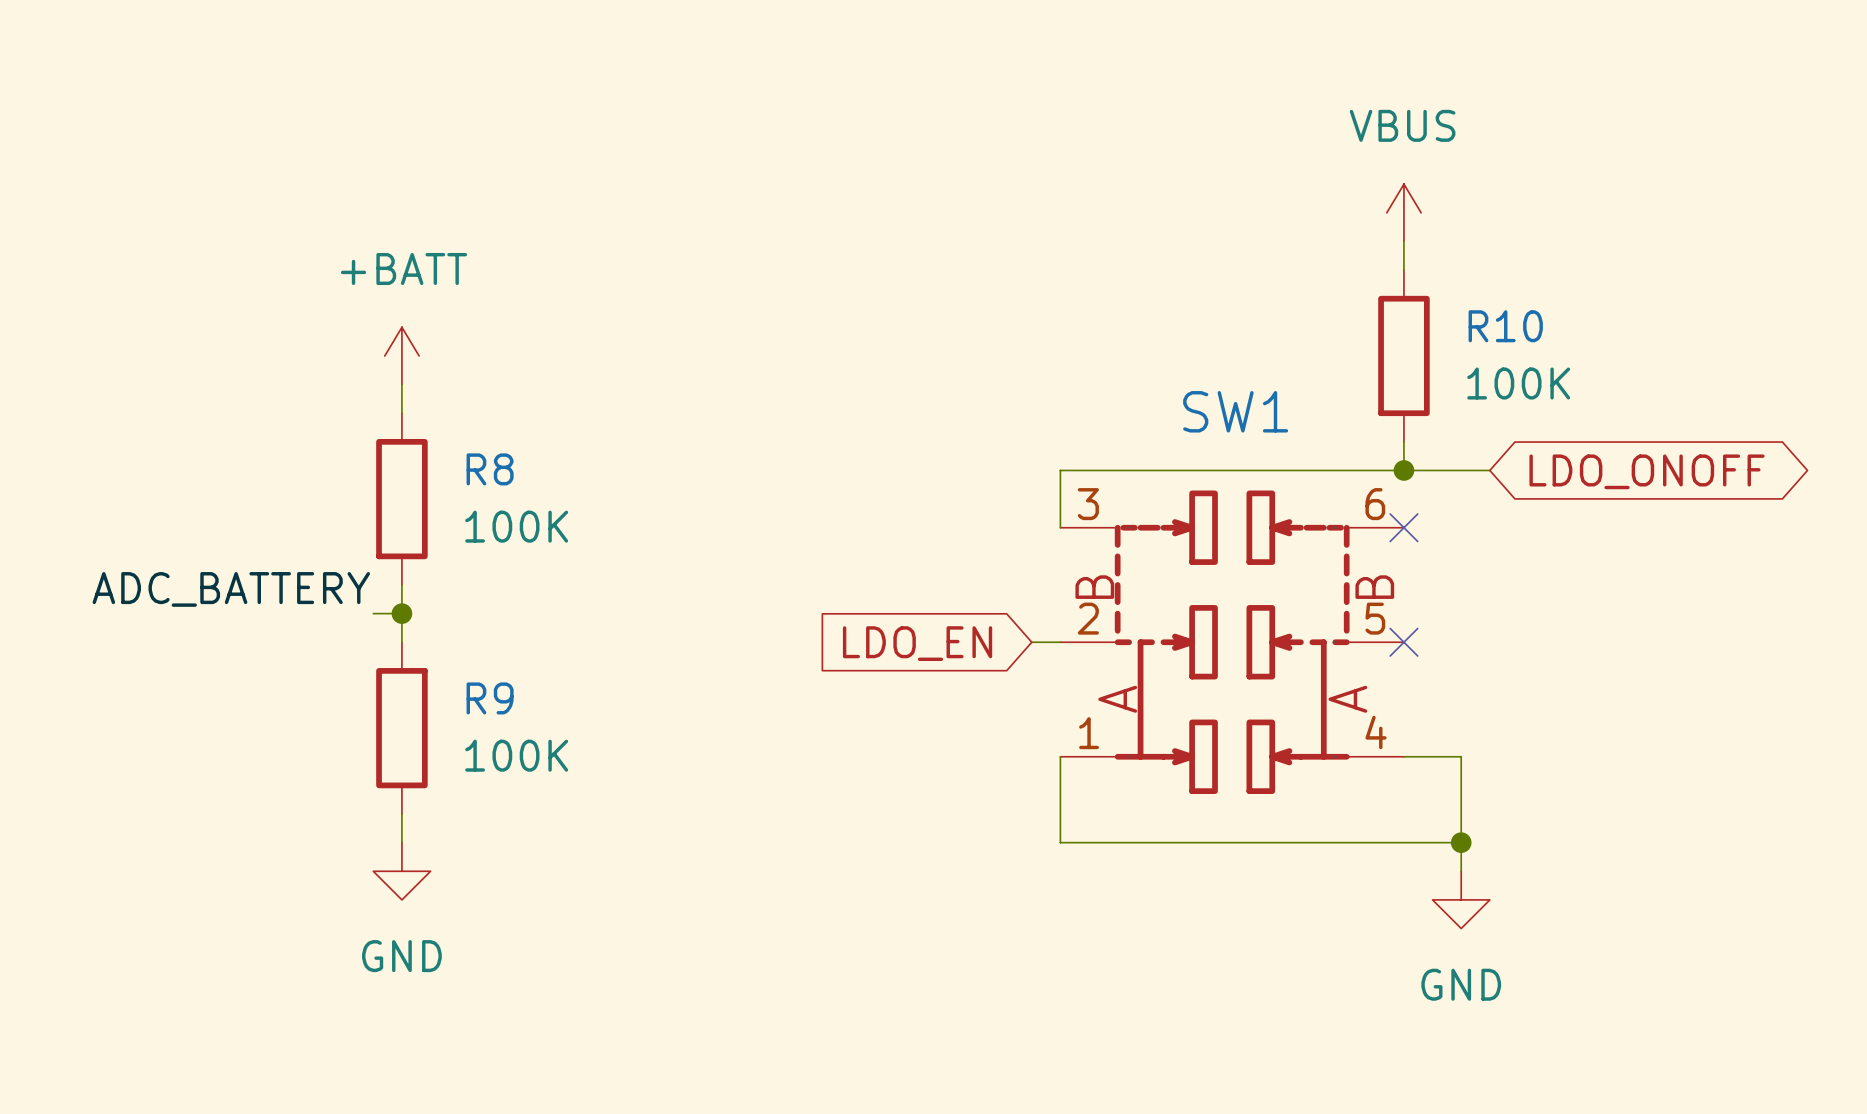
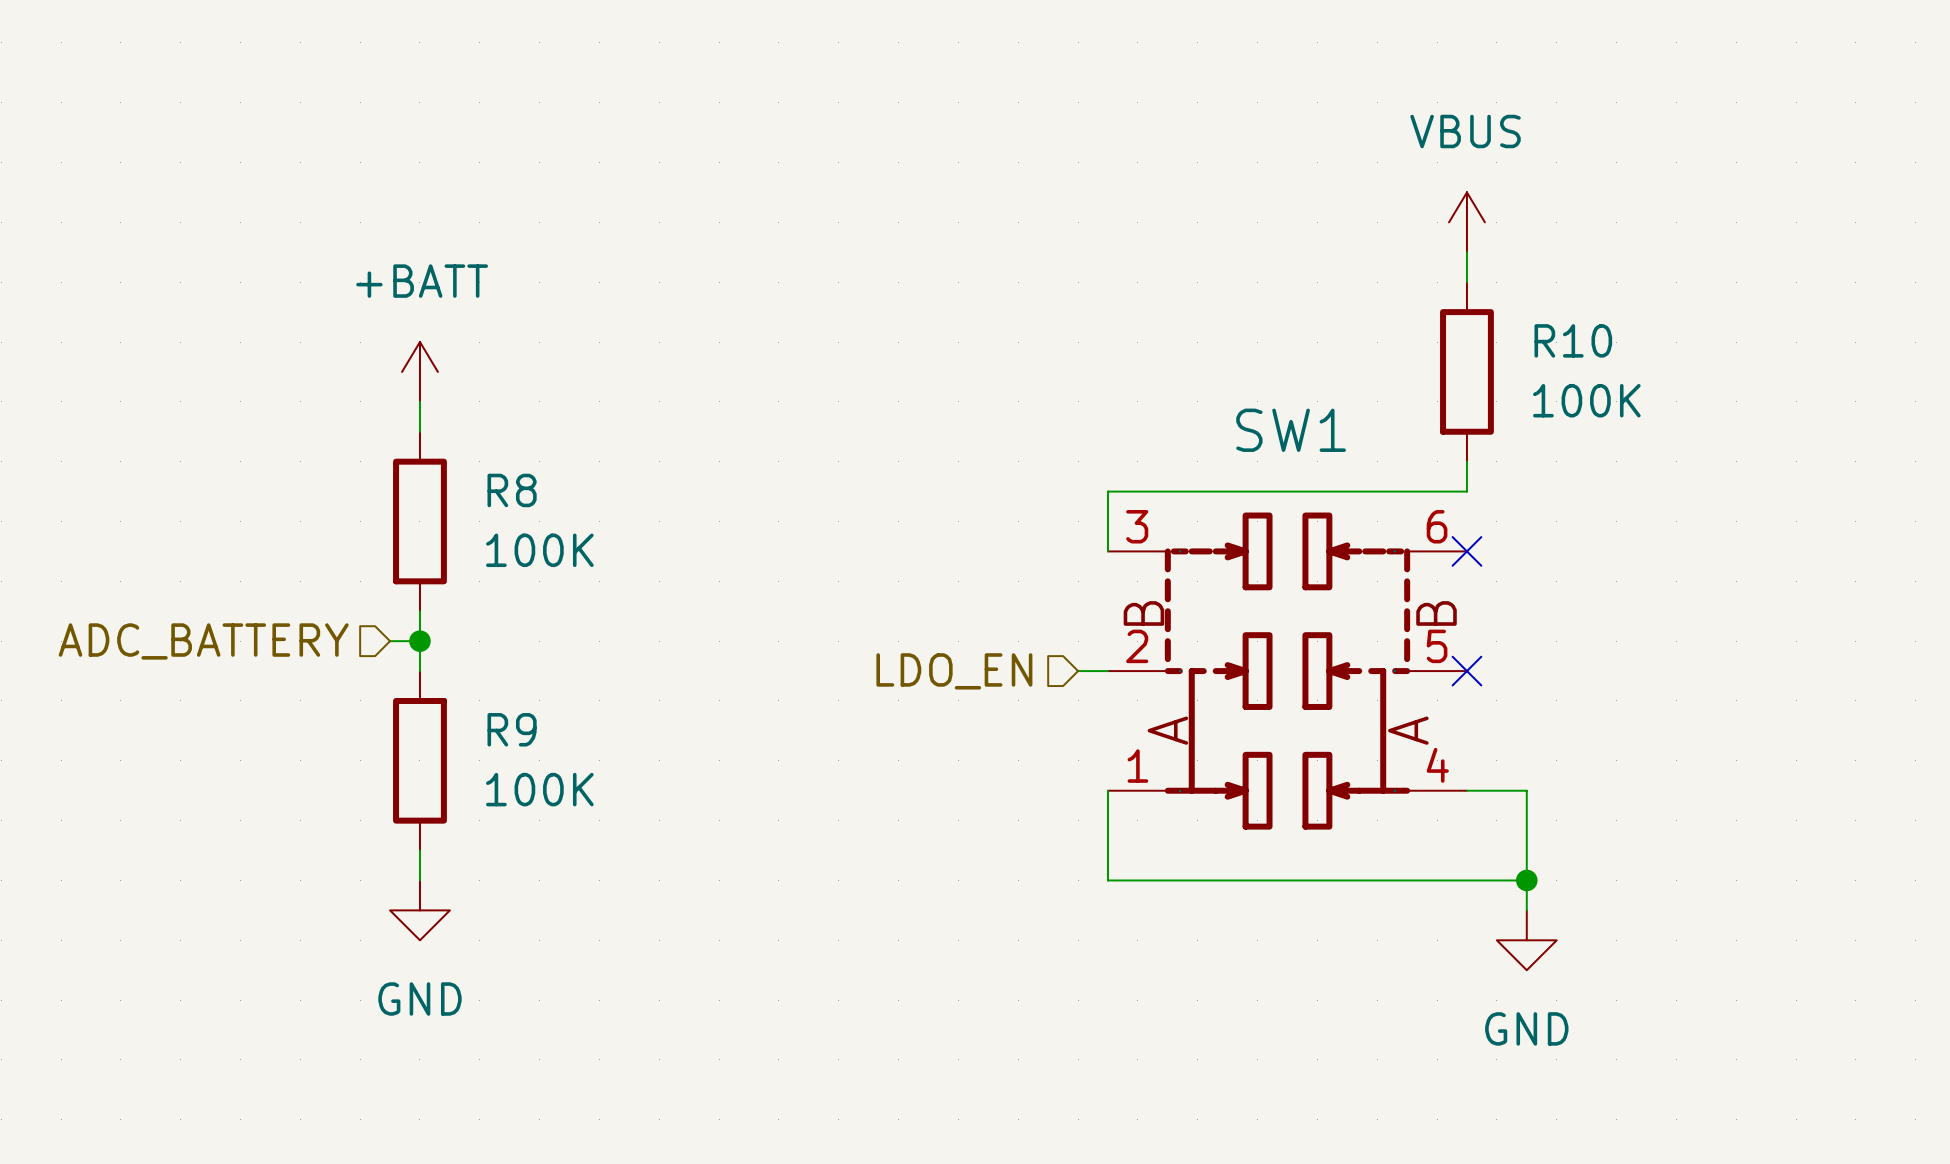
wire: (1403, 470) (1489, 470) -> none
junction: (1403, 470) -> none
global label: LDO_ONOFF (1647, 471) -> none
label: ADC_BATTERY (231, 589) -> none
hierarchical label: none -> ADC_BATTERY (203, 641)
hierarchical label: none -> LDO_EN (954, 671)
global label: LDO_EN (917, 643) -> none

